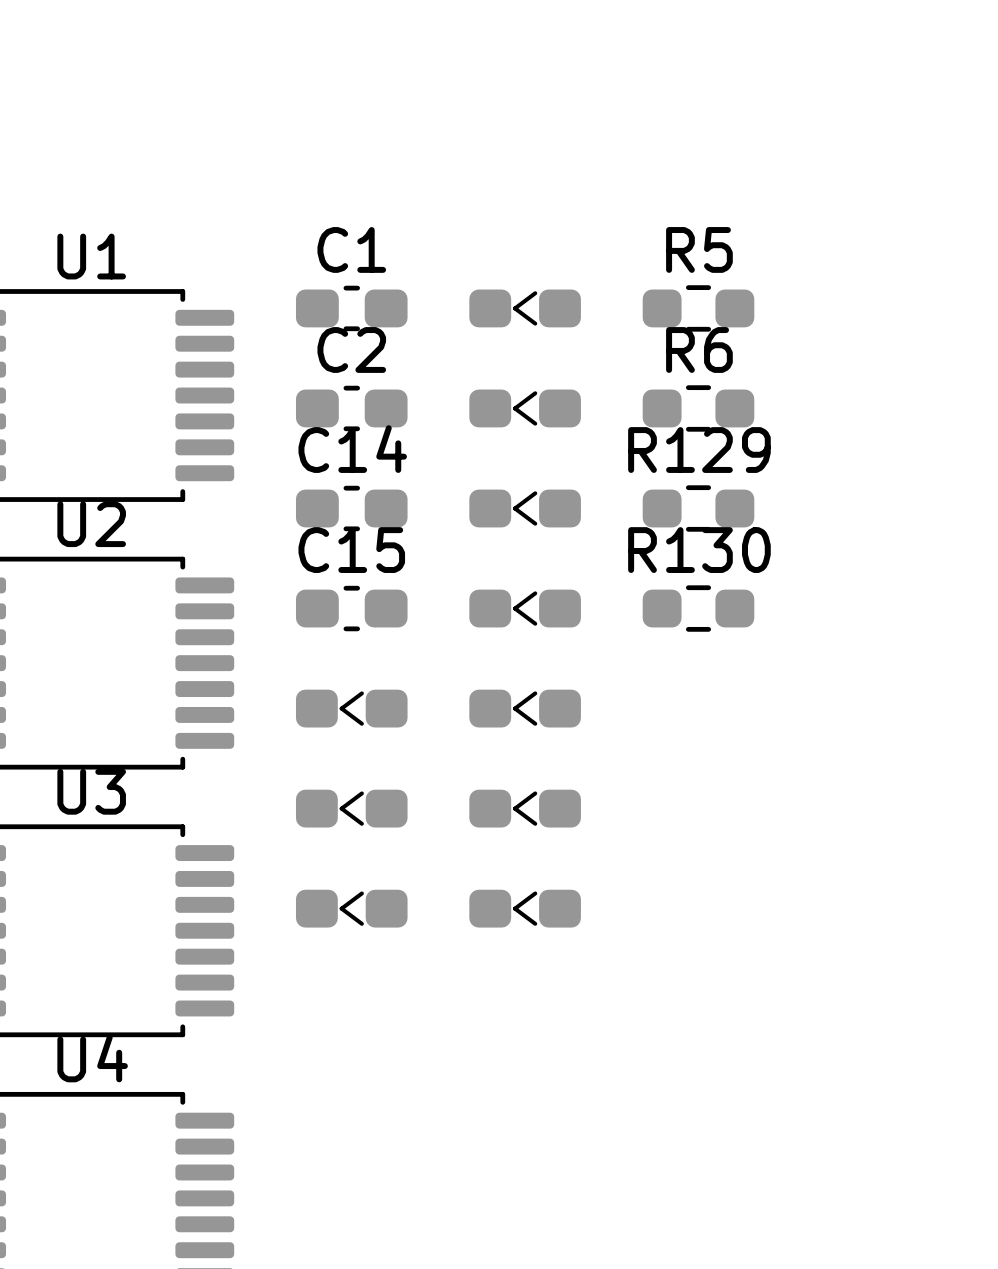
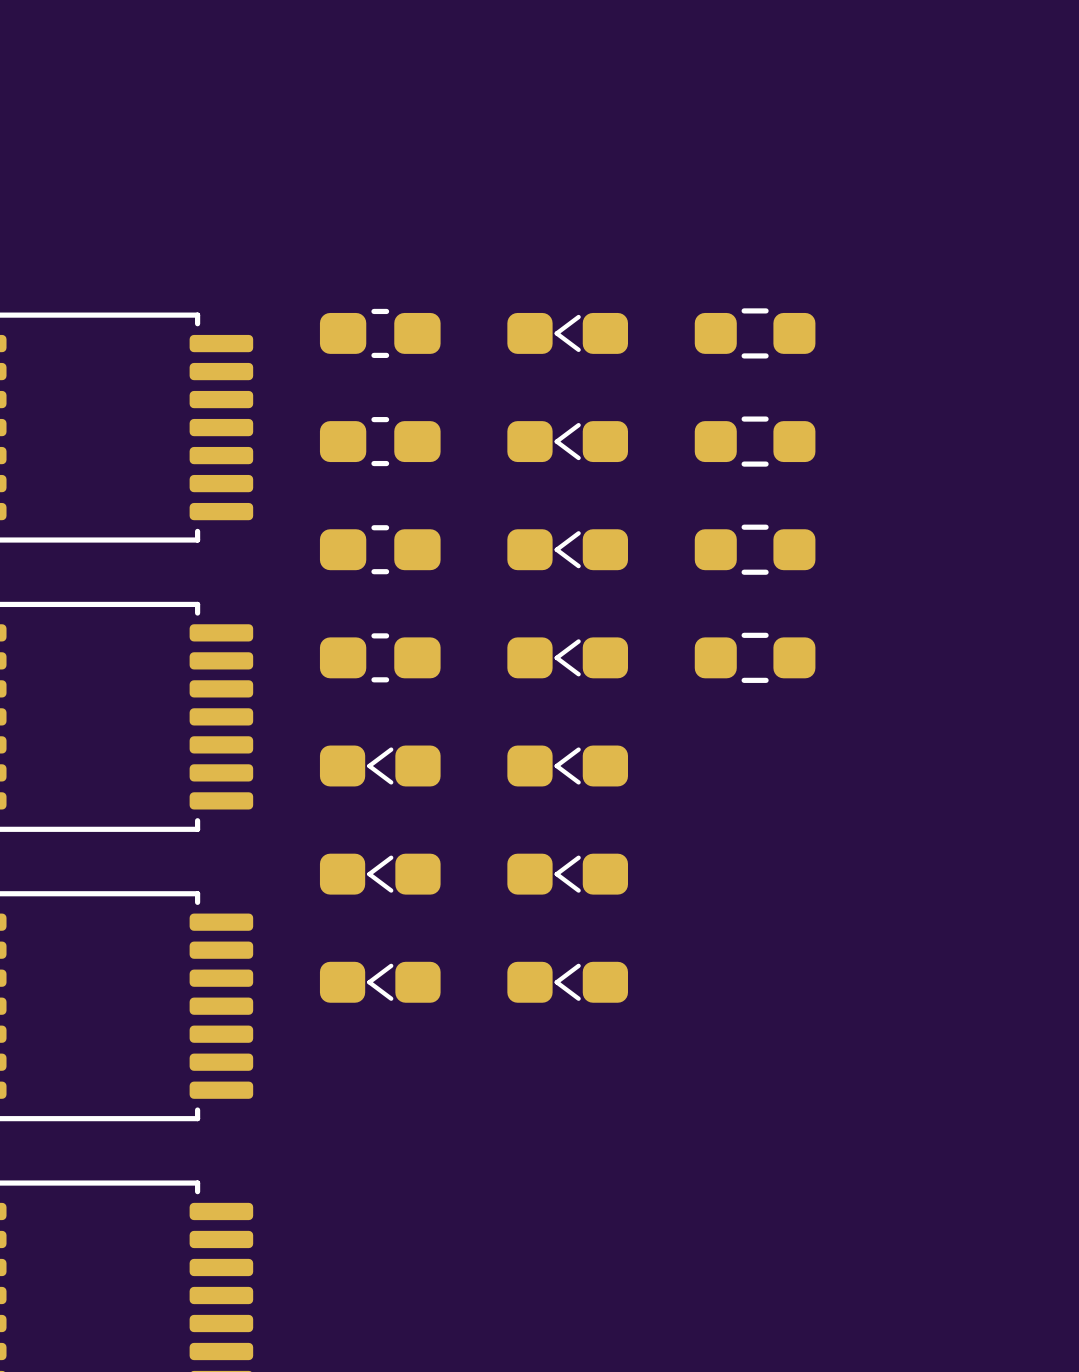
C1 name: C1 (351, 249) -> none
R5 name: R5 (699, 249) -> none
U1 name: U1 (91, 256) -> none
C2 name: C2 (351, 349) -> none
R6 name: R6 (699, 349) -> none
C14 name: C14 (352, 449) -> none
R129 name: R129 (699, 450) -> none
U2 name: U2 (91, 524) -> none
C15 name: C15 (351, 550) -> none
R130 name: R130 (699, 550) -> none
U3 name: U3 (91, 791) -> none
U4 name: U4 (92, 1058) -> none

